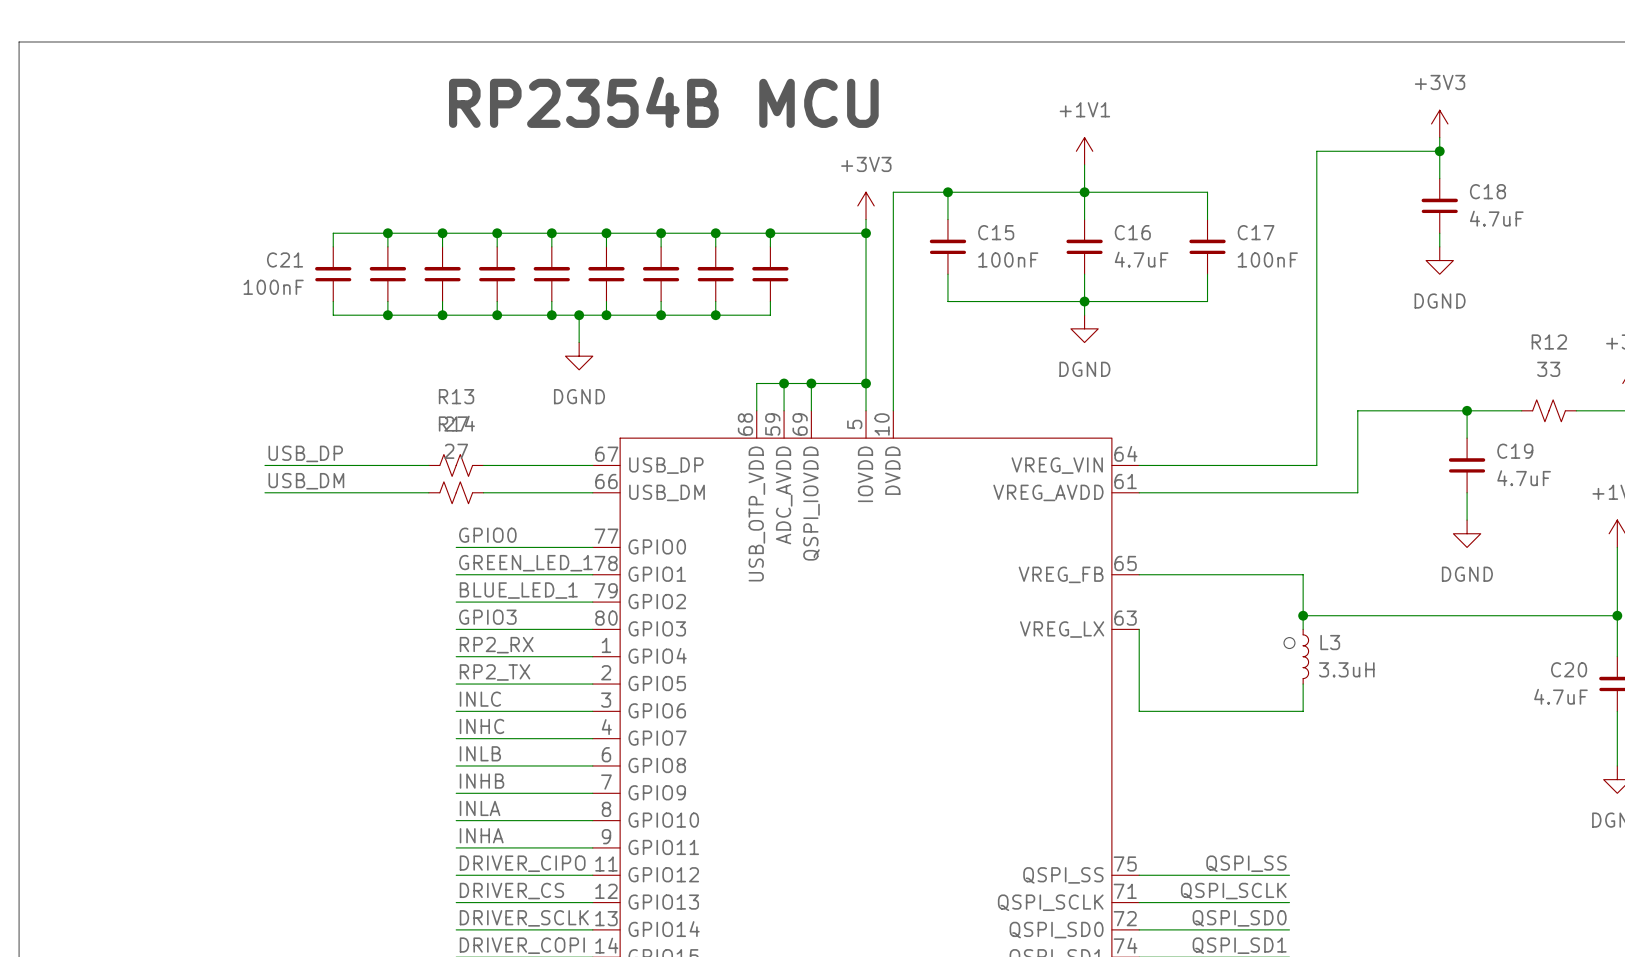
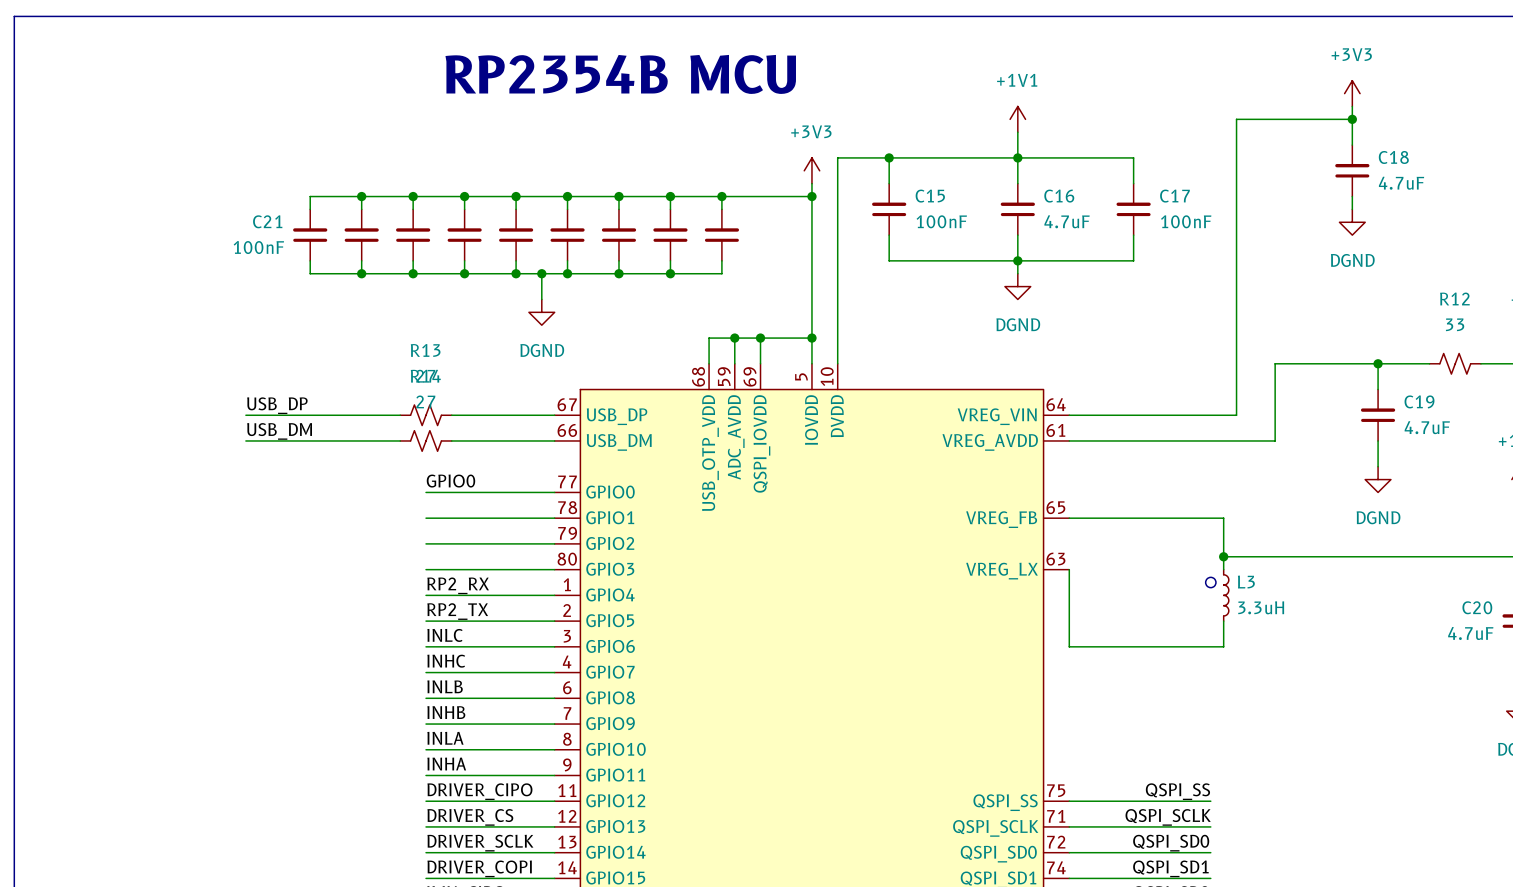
label: GREEN_LED_1 (525, 563) -> none
label: BLUE_LED_1 (518, 590) -> none
label: GPIO3 (487, 617) -> none

